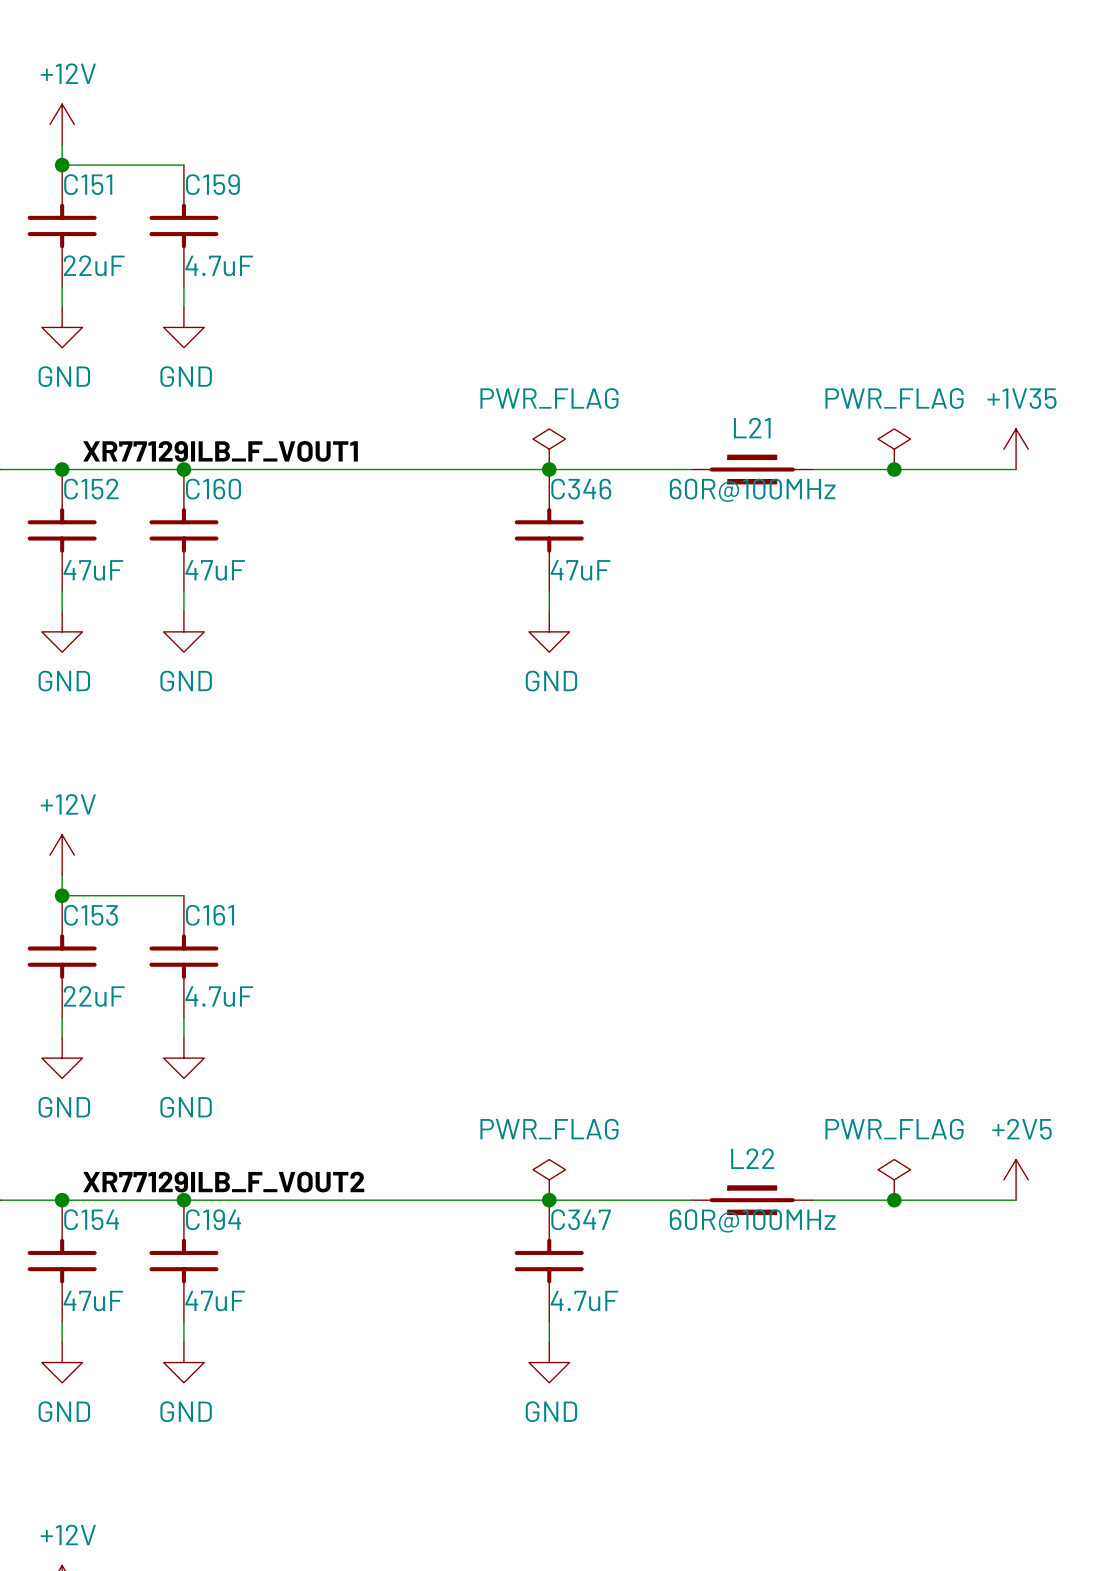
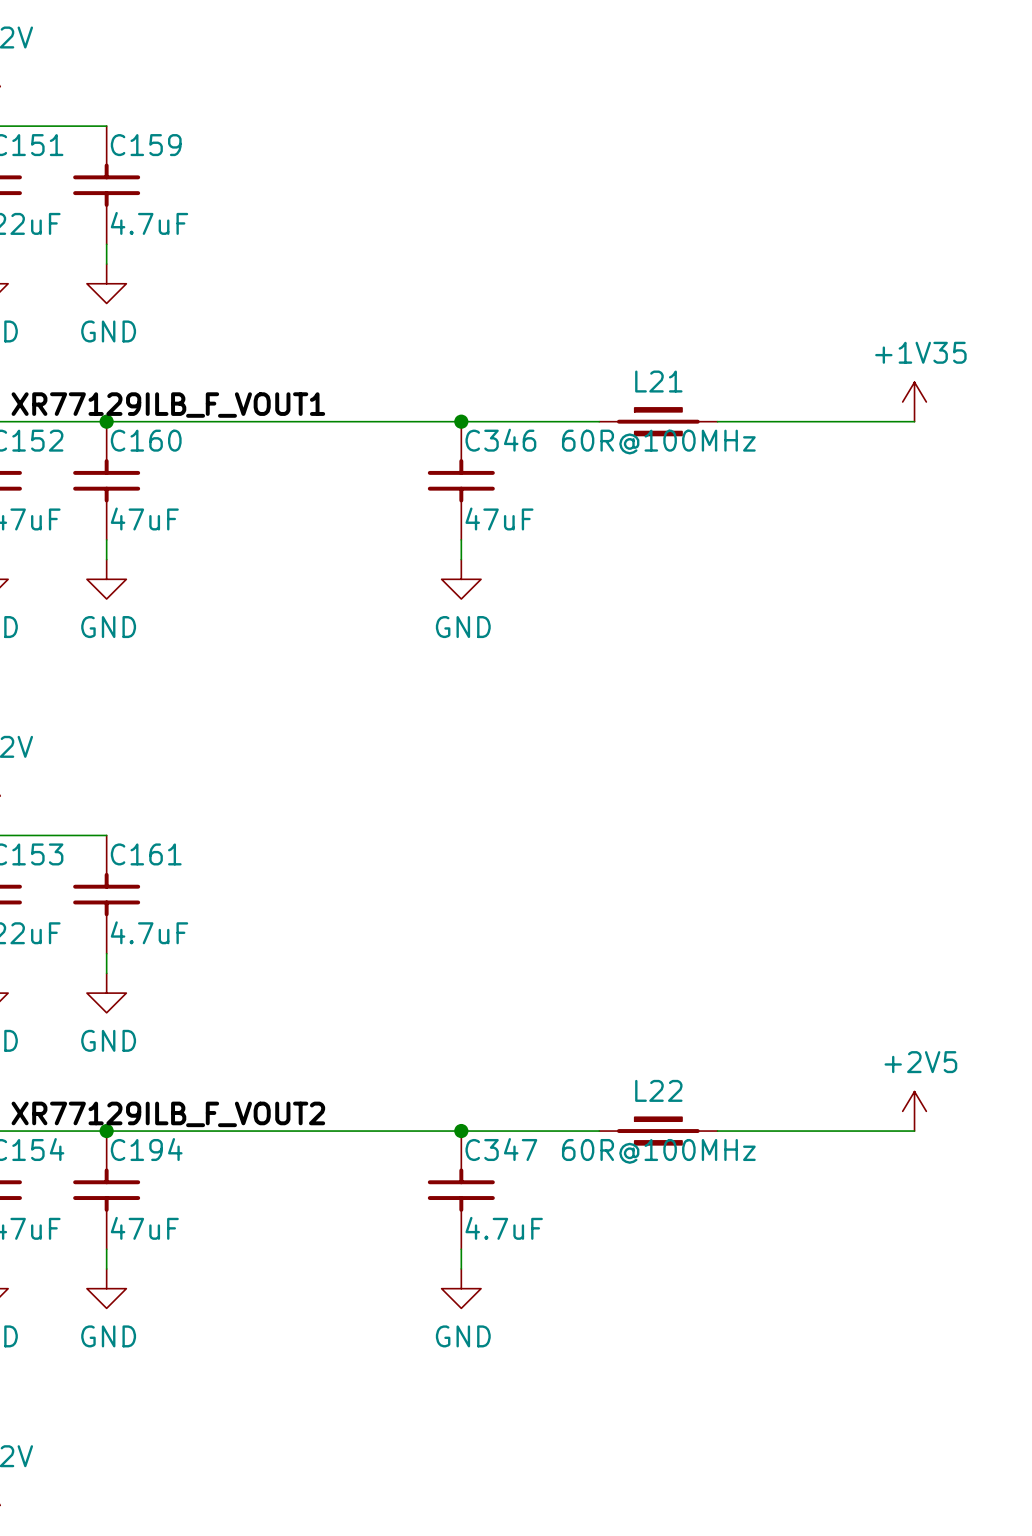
power symbol: PWR_FLAG (549, 449) -> none
power symbol: PWR_FLAG (894, 449) -> none
junction: (894, 469) -> none
power symbol: PWR_FLAG (549, 1179) -> none
power symbol: PWR_FLAG (894, 1179) -> none
junction: (894, 1200) -> none

